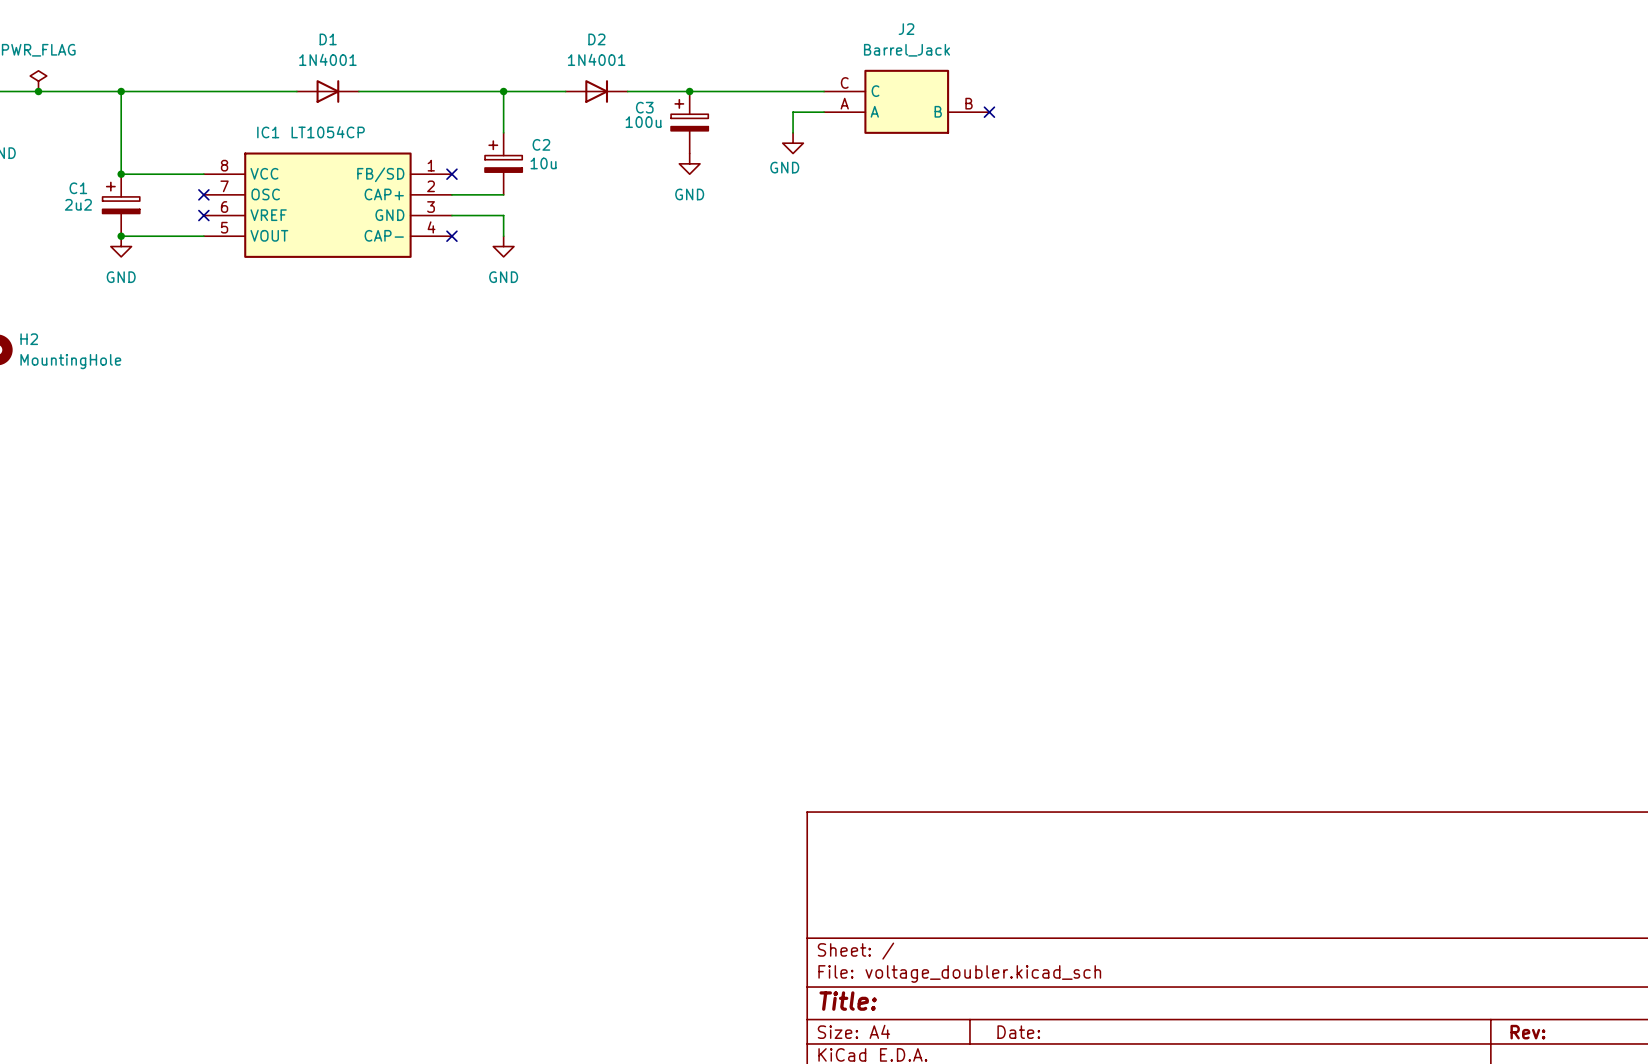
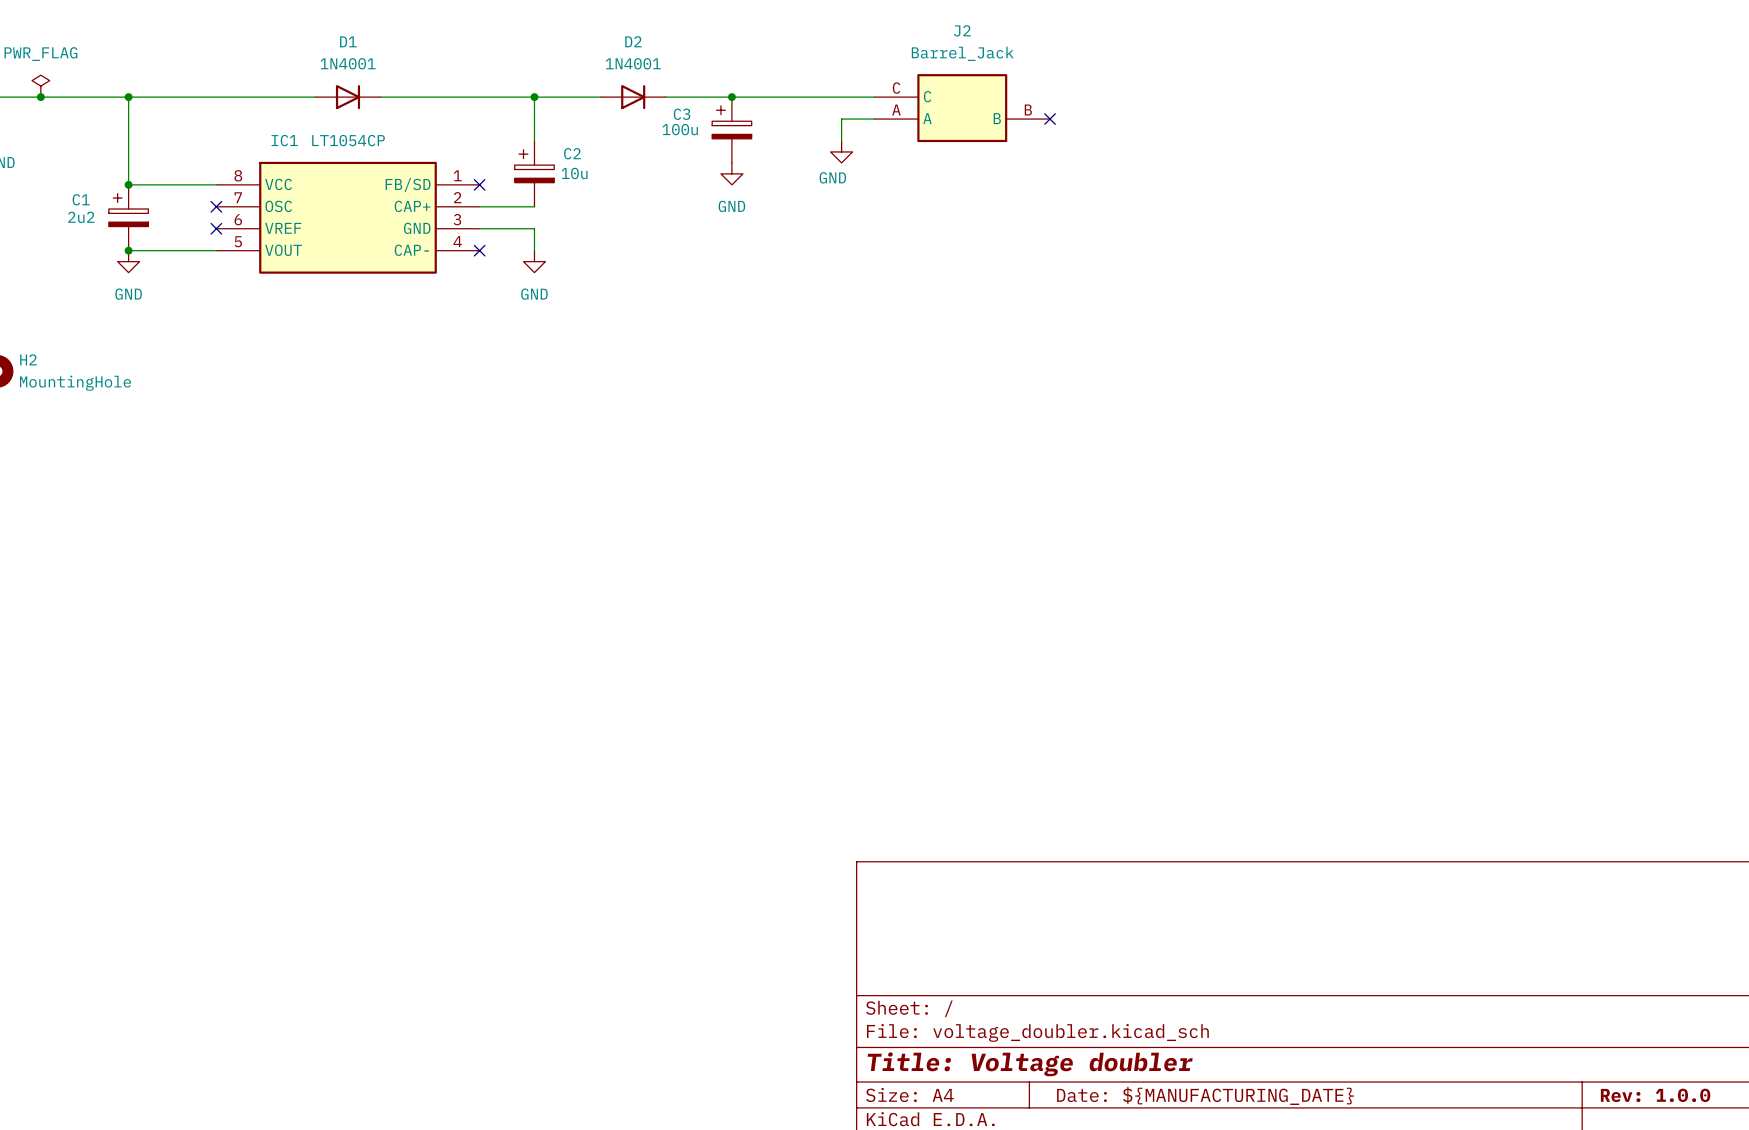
title block: Title: (848, 1001) -> Title: Voltage doubler (1030, 1064)
title block: Date: (1018, 1032) -> Date: ${MANUFACTURING_DATE} (1205, 1095)
title block: Rev: (1527, 1032) -> Rev: 1.0.0 (1655, 1095)

